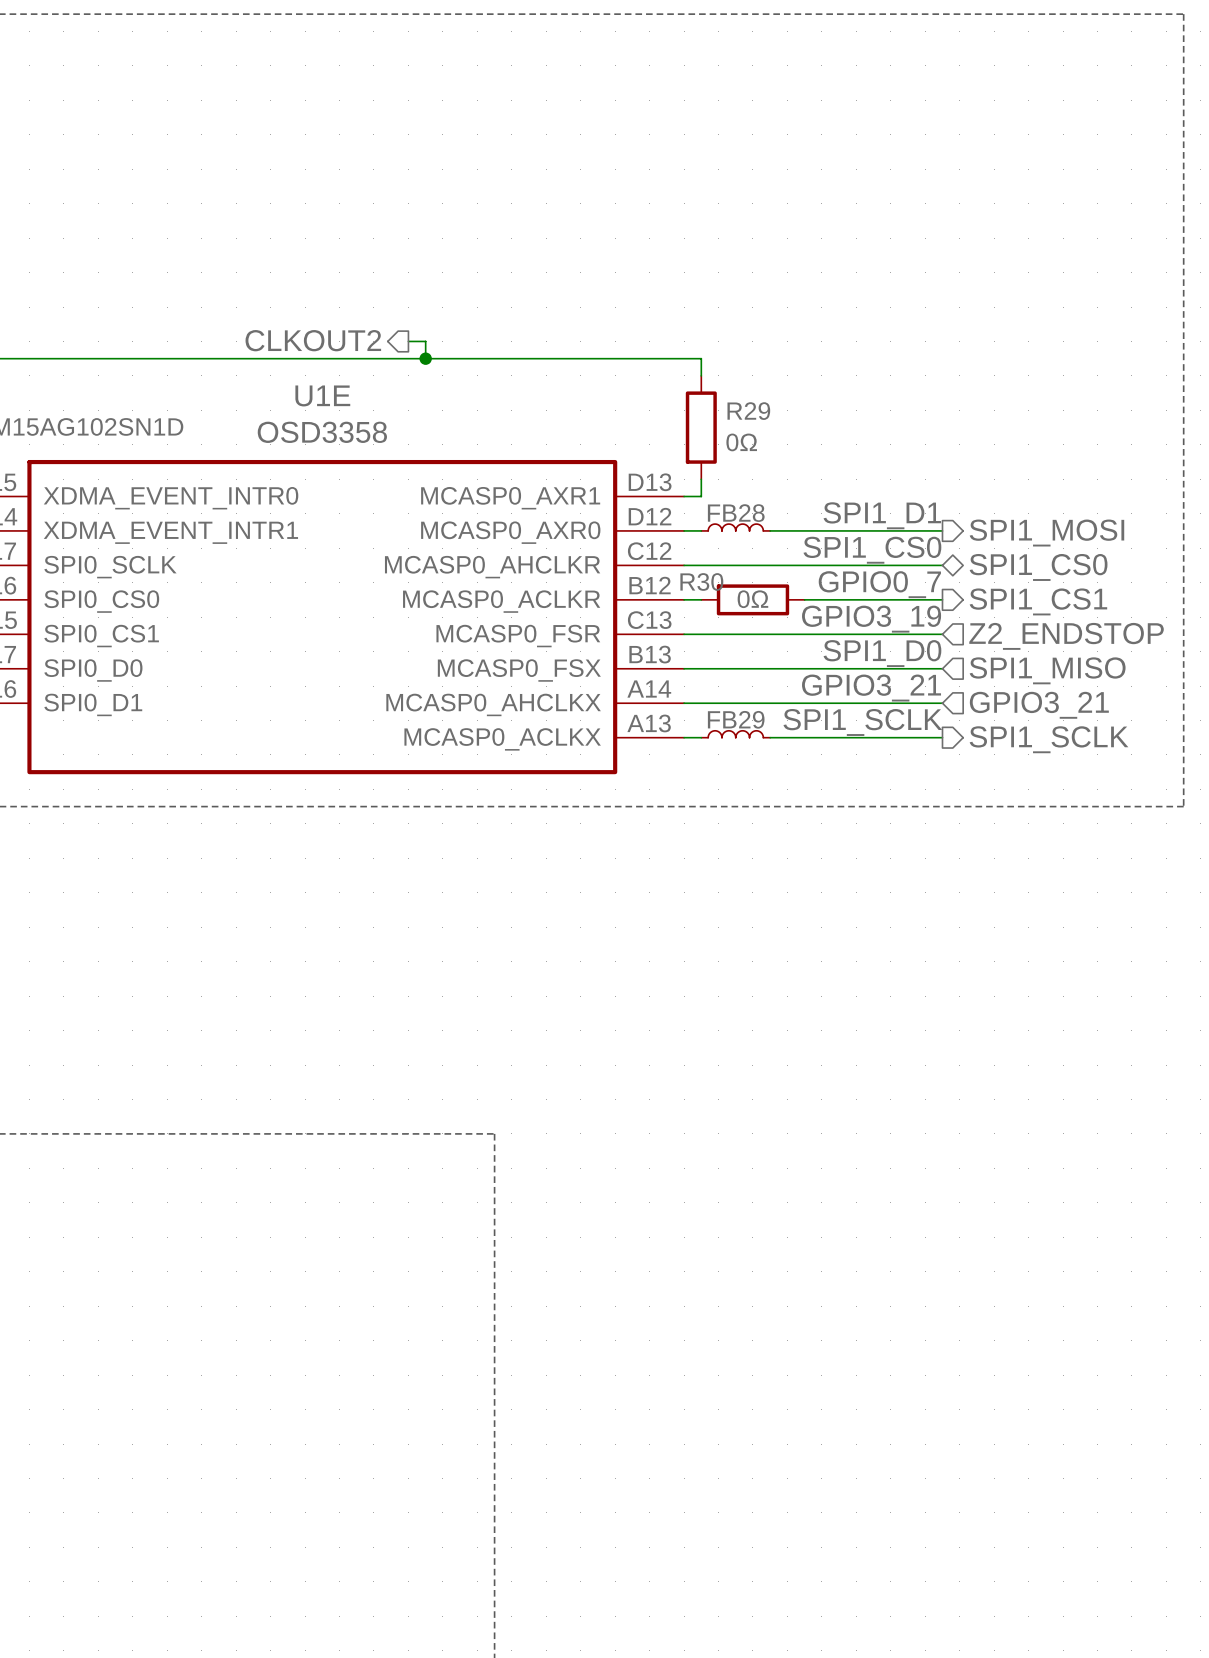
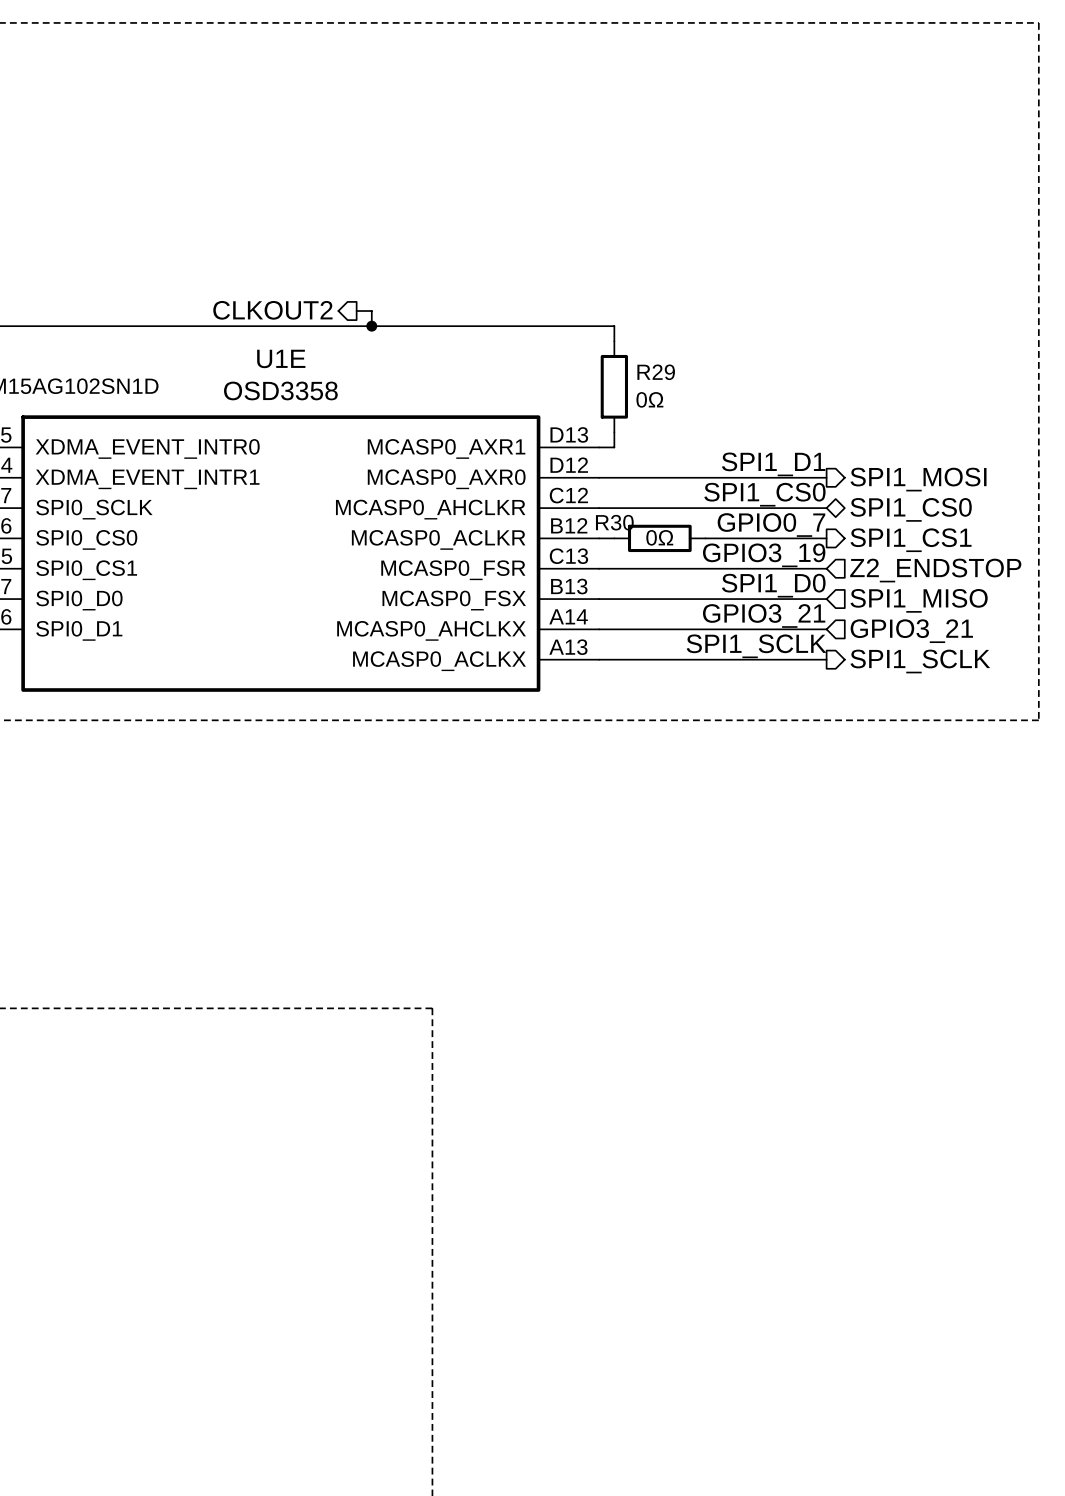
FB28: (735, 527) -> none
wire: none -> (614, 477) (674, 477)
FB29: (735, 734) -> none
wire: none -> (614, 659) (674, 659)

